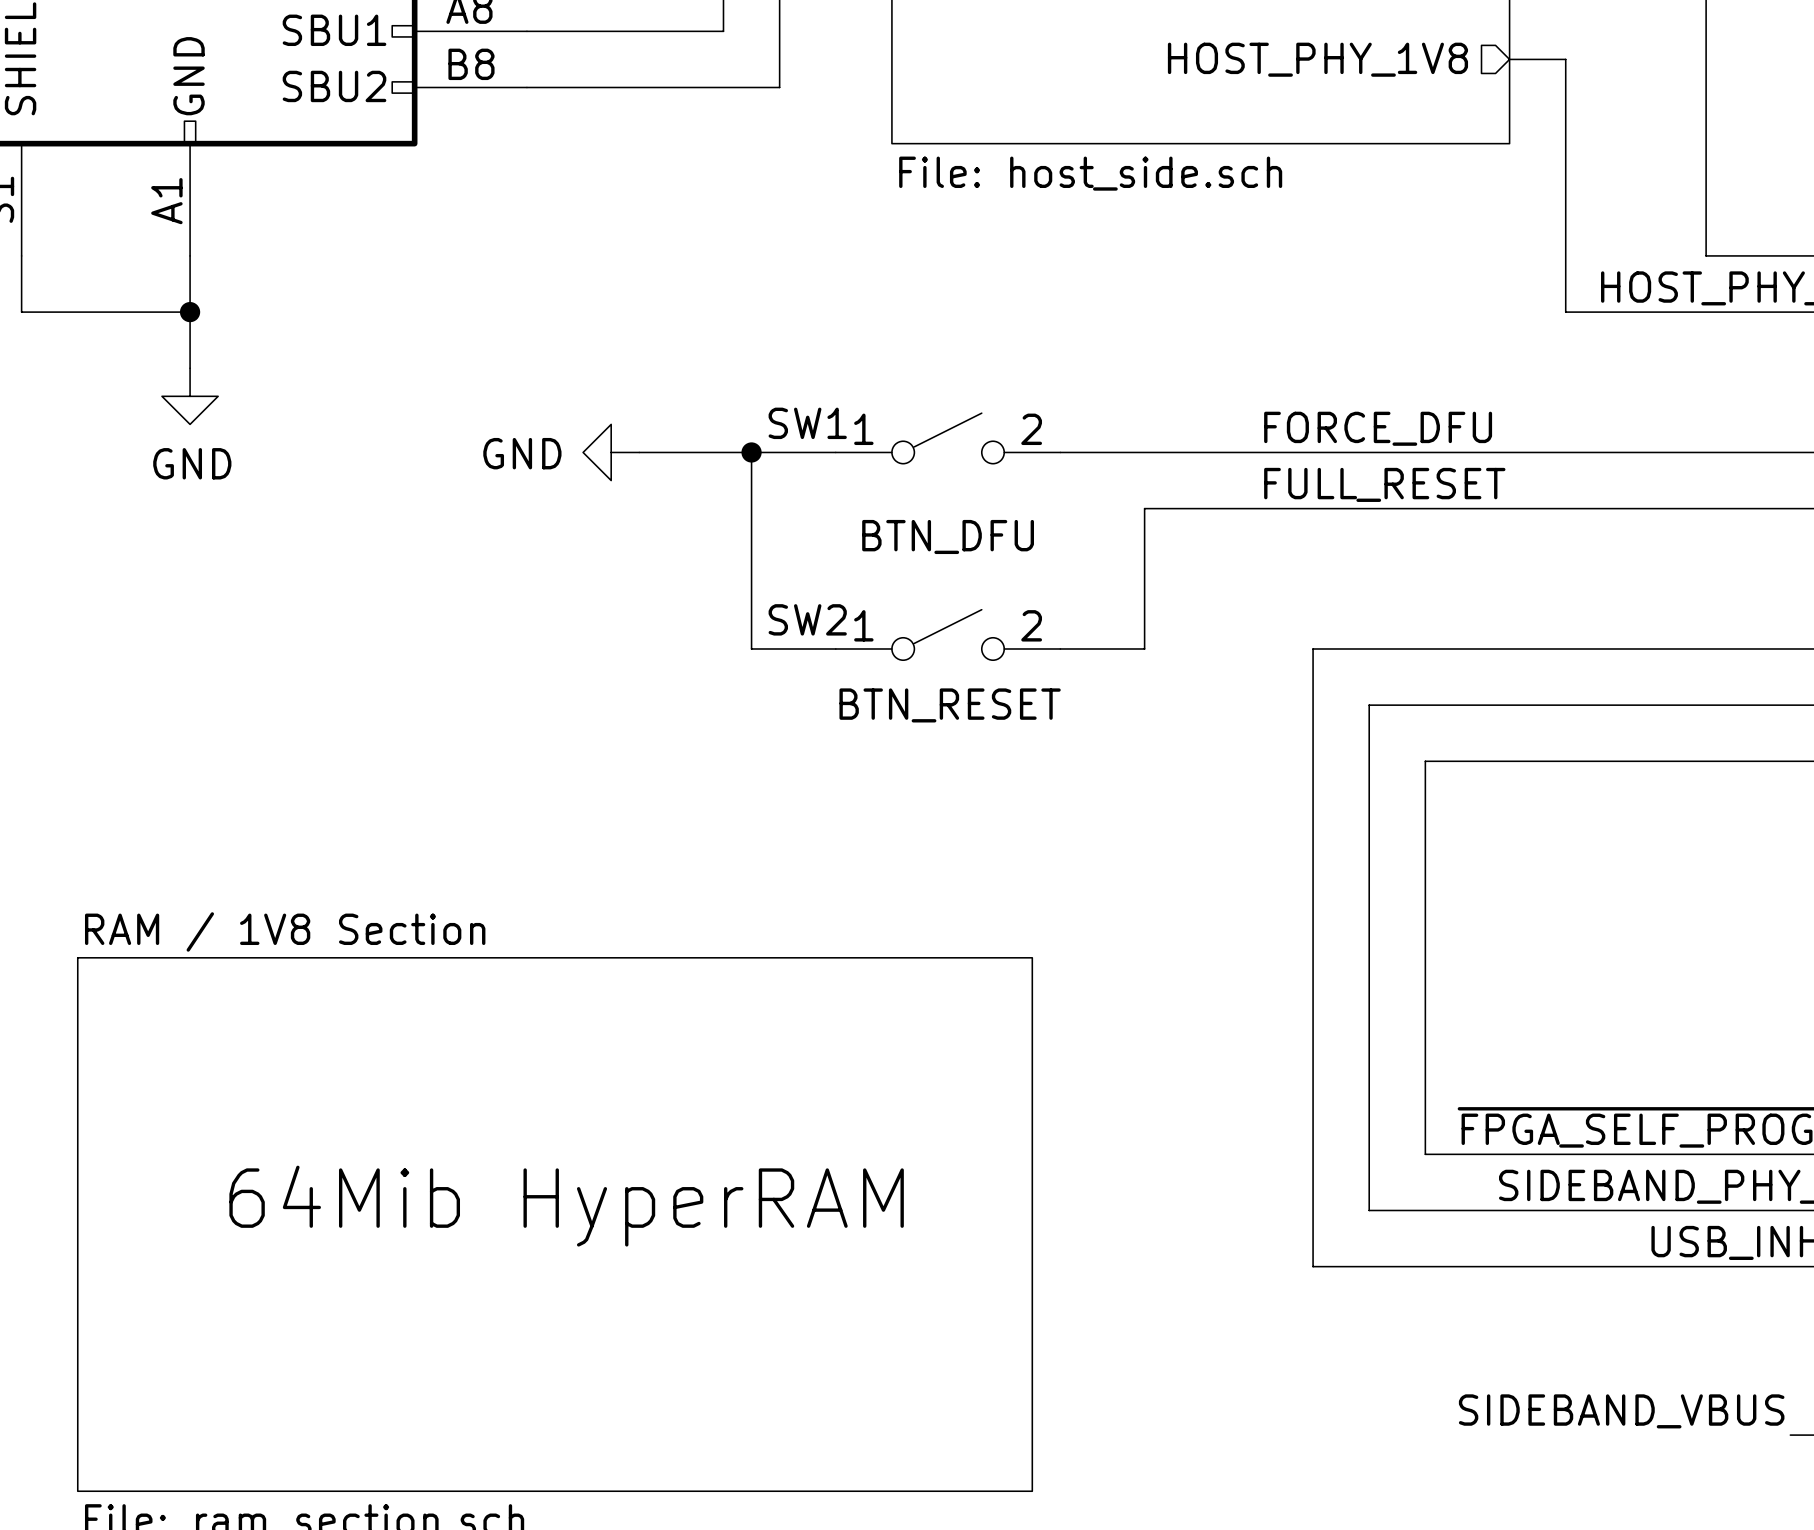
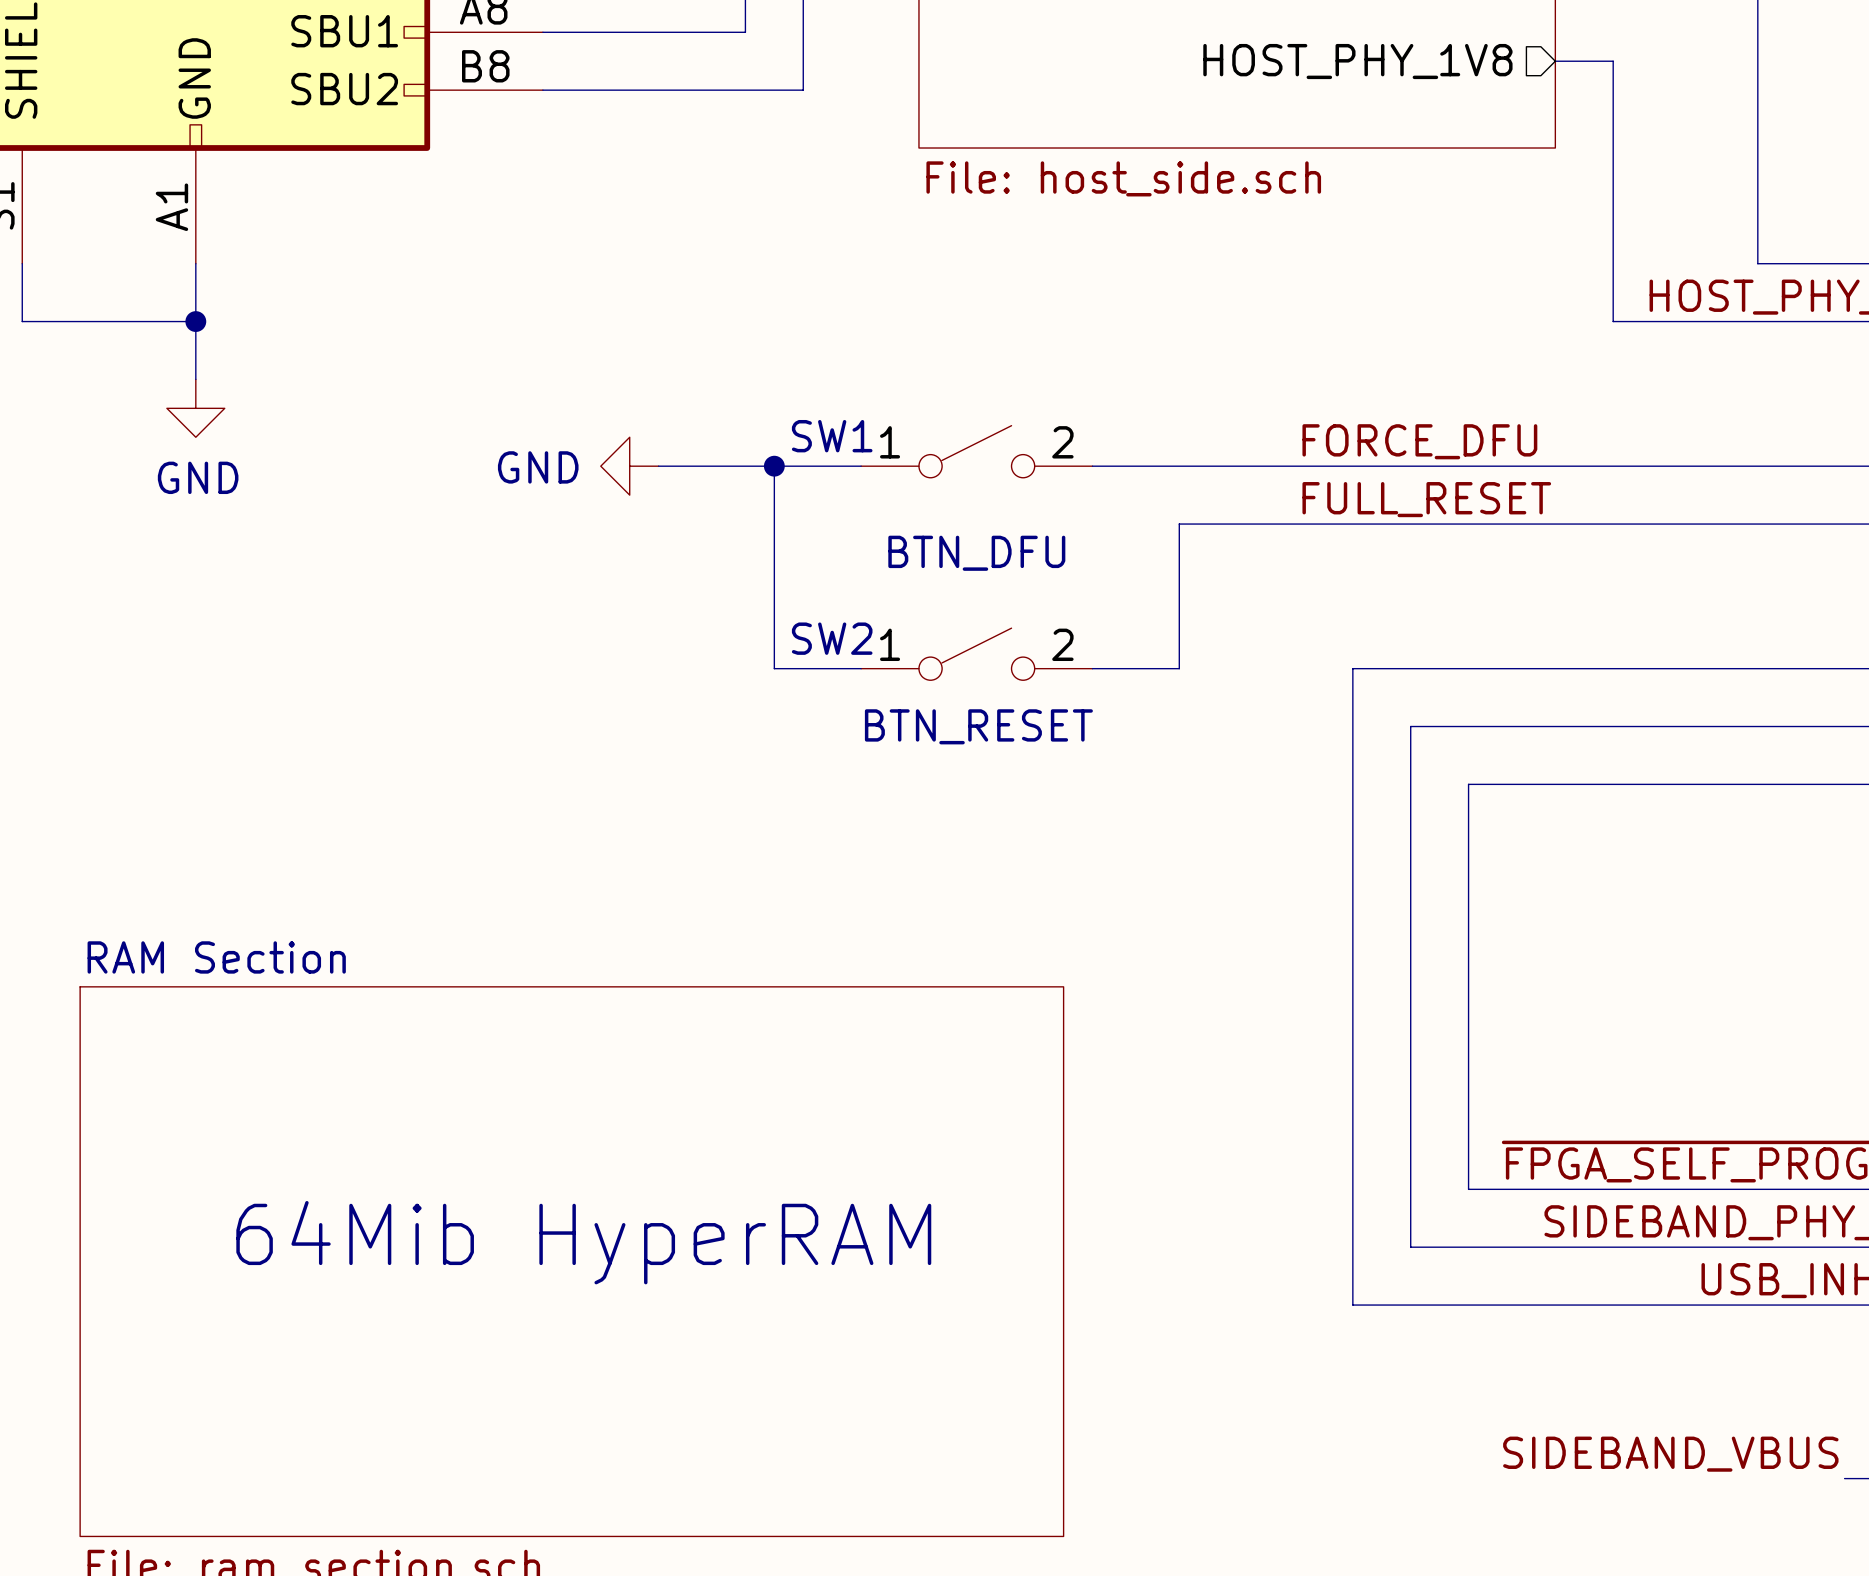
sheet RAM / 1V8 Section name: RAM / 1V8 Section (285, 931) -> RAM Section (216, 957)

